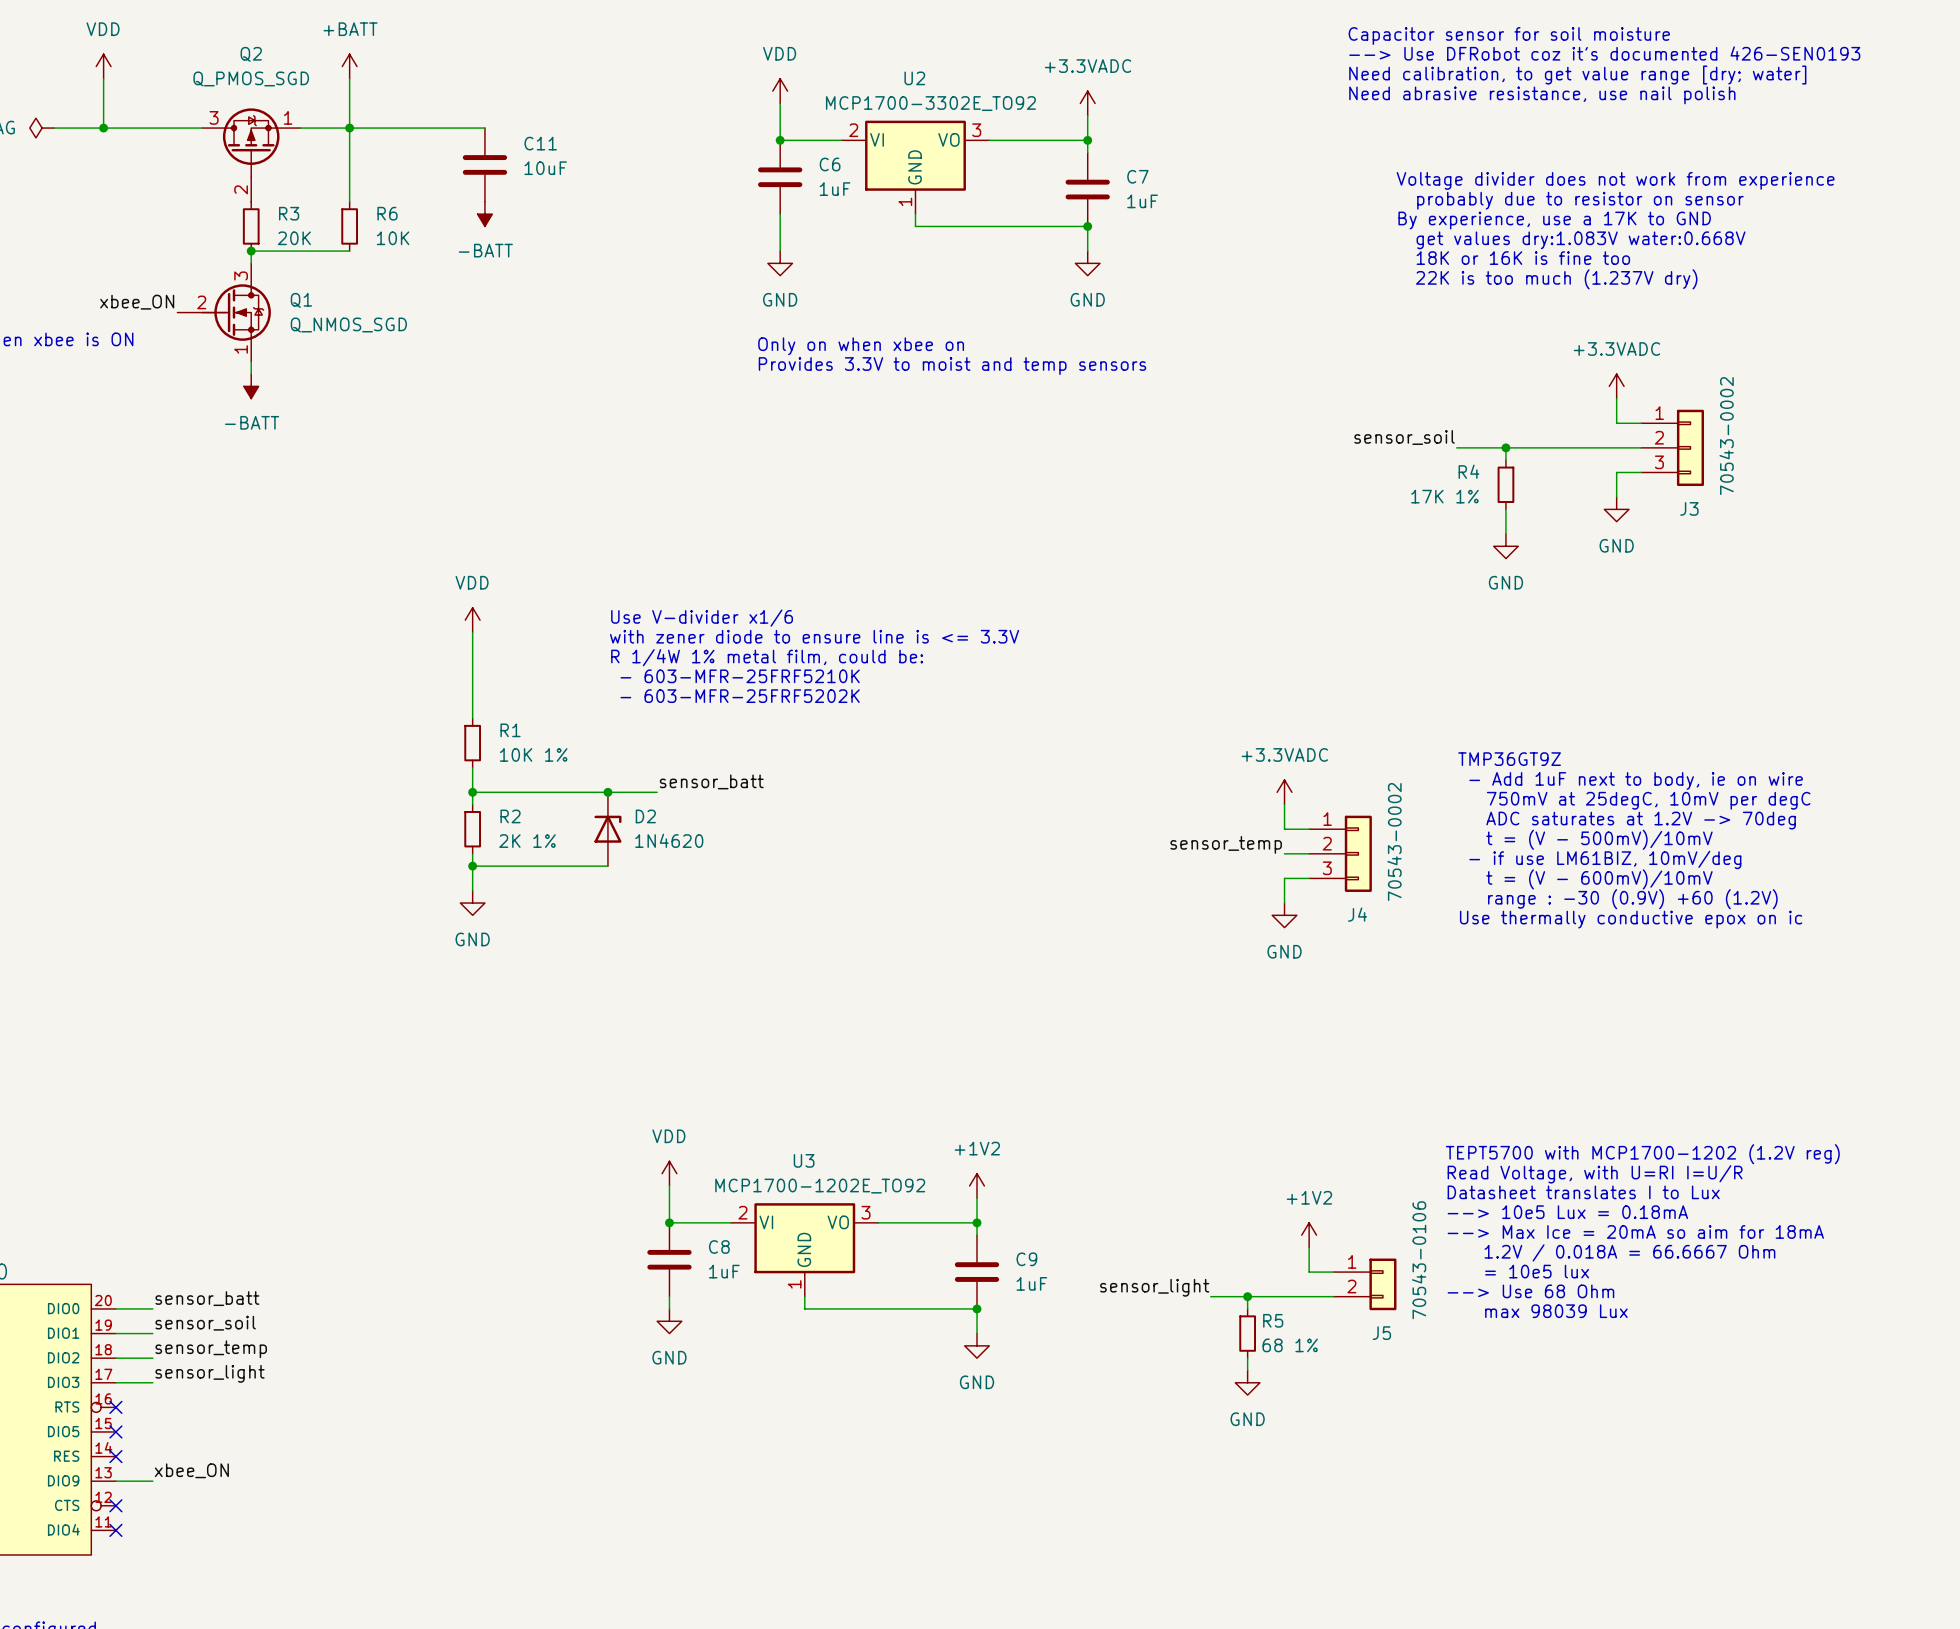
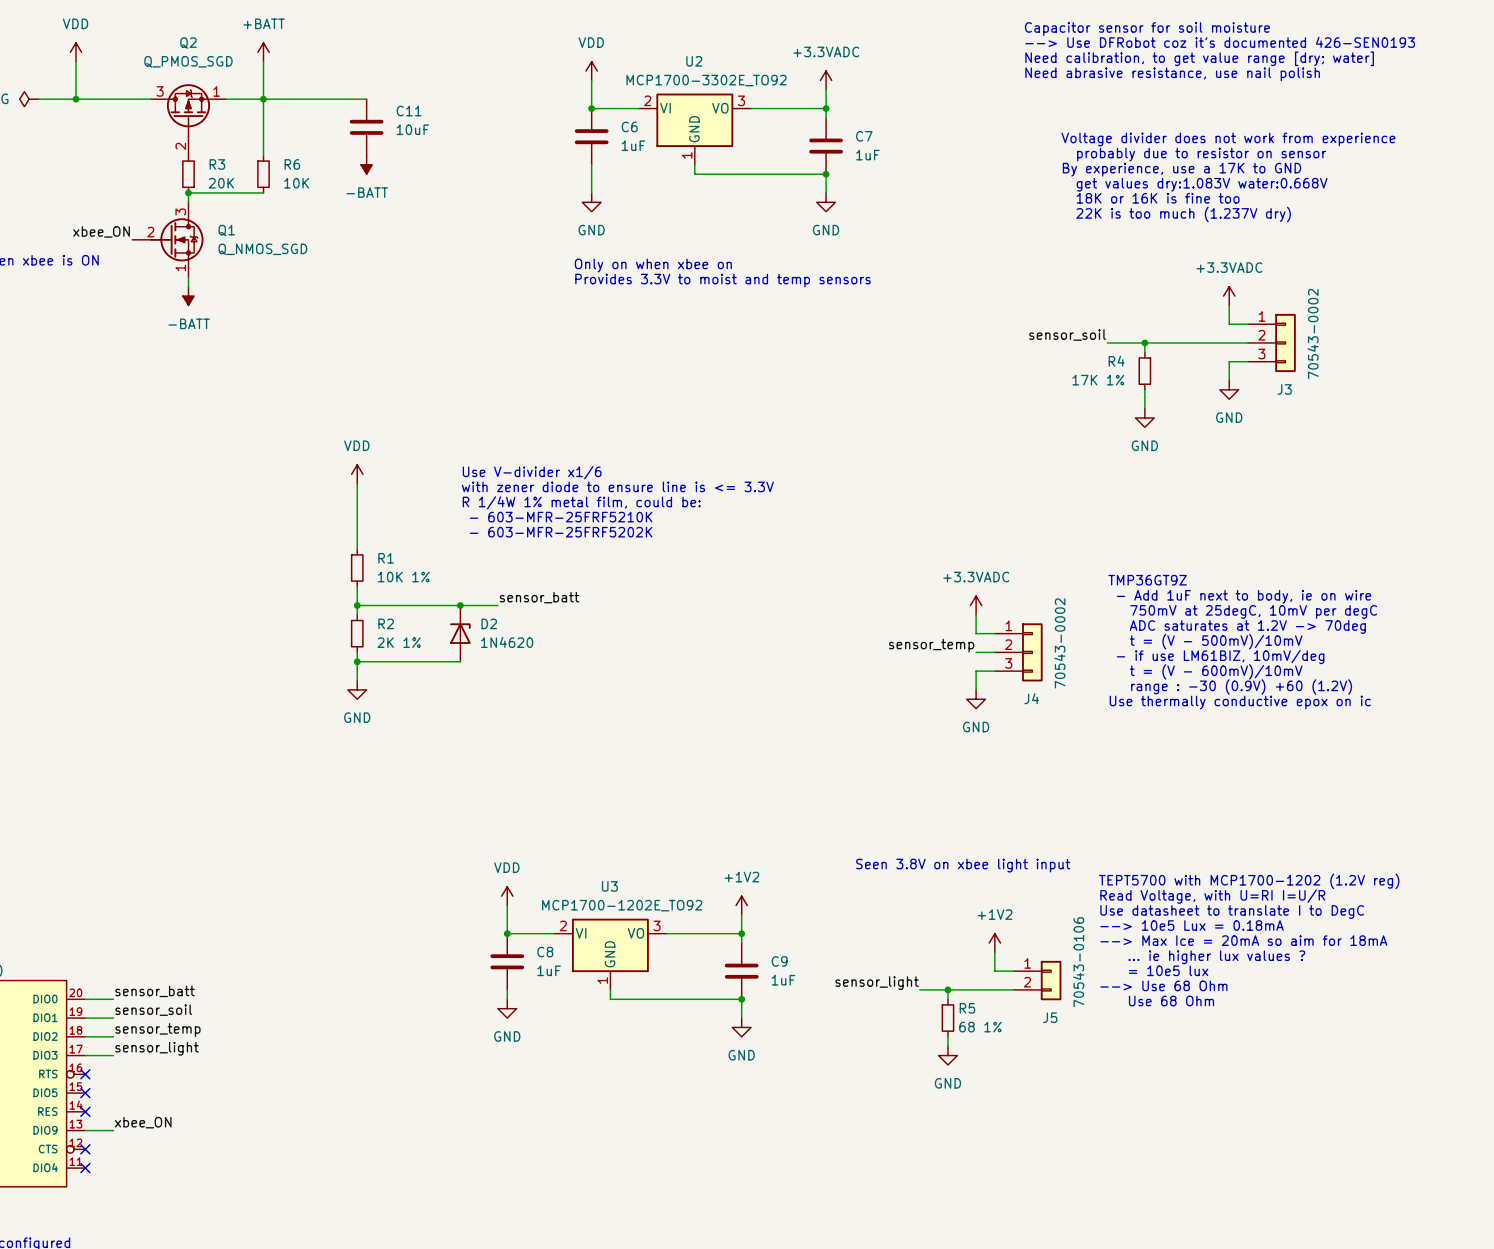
text: none -> Seen 3.8V on xbee light input (963, 865)
text: Datasheet translates I to Lux (1583, 1192) -> Use datasheet to translate I to DegC (1232, 911)
text: 1.2V / 0.018A = 66.6667 Ohm (1629, 1252) -> ... ie higher lux values ? (1216, 957)
text: max 98039 Lux (1556, 1311) -> Use 68 Ohm (1171, 1001)

